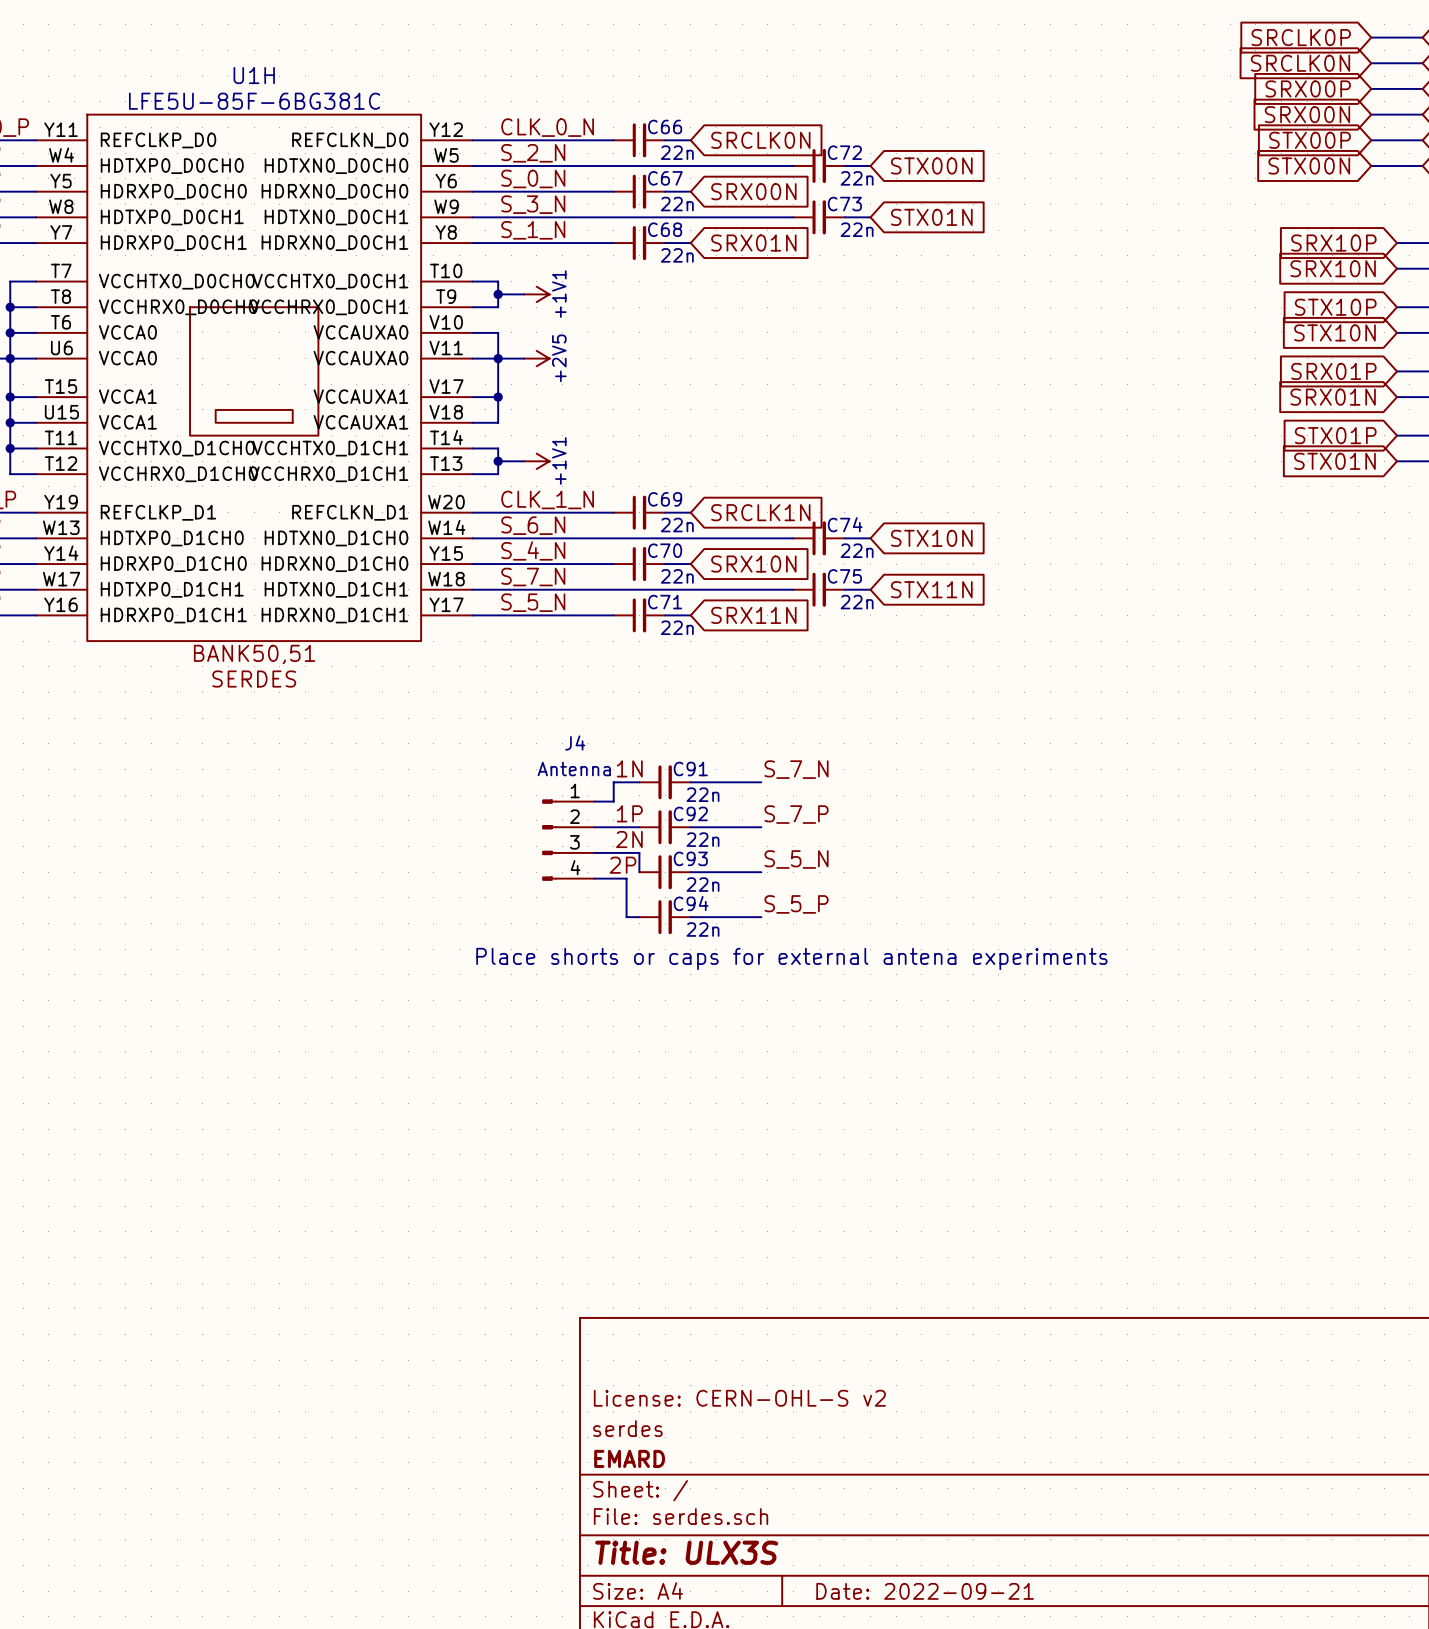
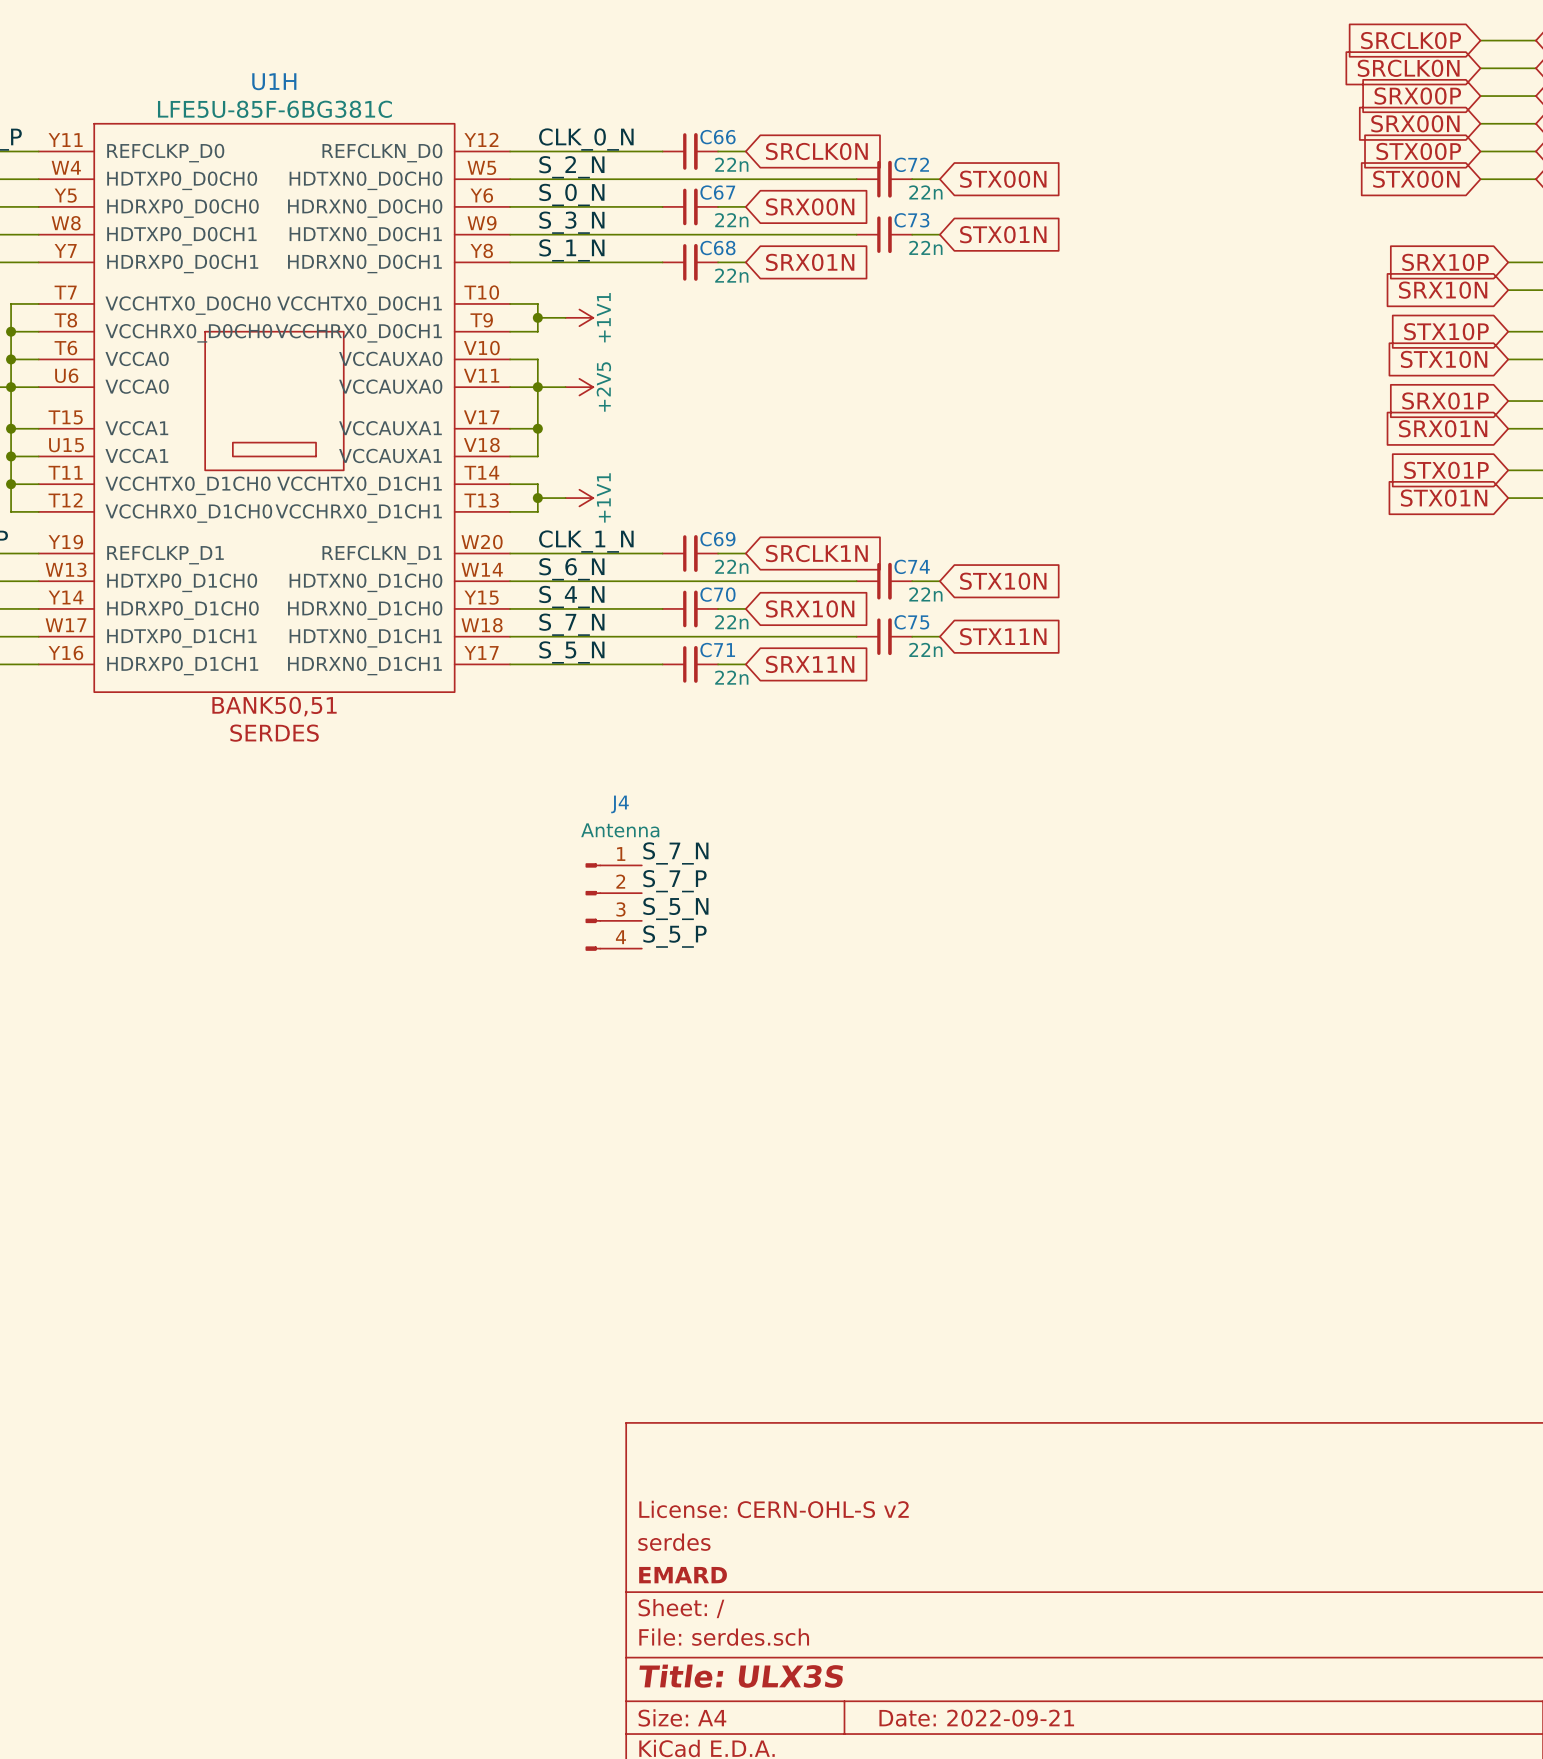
label: 1N (629, 768) -> none
label position: S_7_N (796, 769) -> S_7_N (675, 853)
wire: (639, 782) (613, 782) (613, 801) (594, 801) -> none
C91: 22n (665, 782) -> none
wire: (690, 782) (761, 782) -> none
label: 1P (629, 813) -> none
label position: S_7_P (796, 814) -> S_7_P (674, 881)
wire: (594, 827) (639, 827) -> none
C92: 22n (665, 827) -> none
wire: (690, 827) (761, 827) -> none
label: 2N (629, 839) -> none
wire: (594, 852) (639, 852) (639, 872) -> none
label position: S_5_N (796, 859) -> S_5_N (675, 908)
label: 2P (622, 865) -> none
C93: 22n (665, 872) -> none
wire: (690, 872) (761, 872) -> none
wire: (594, 878) (626, 878) (626, 917) (639, 917) -> none
label position: S_5_P (796, 904) -> S_5_P (674, 936)
C94: 22n (665, 917) -> none
wire: (690, 917) (761, 917) -> none
text: Place shorts or caps for external antena experiments (791, 958) -> none

